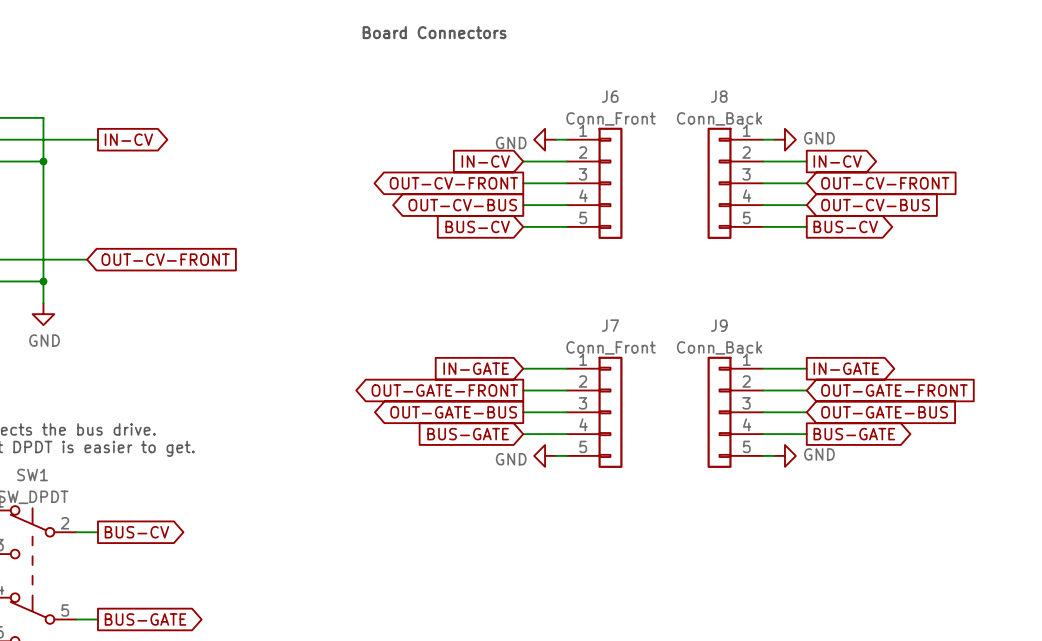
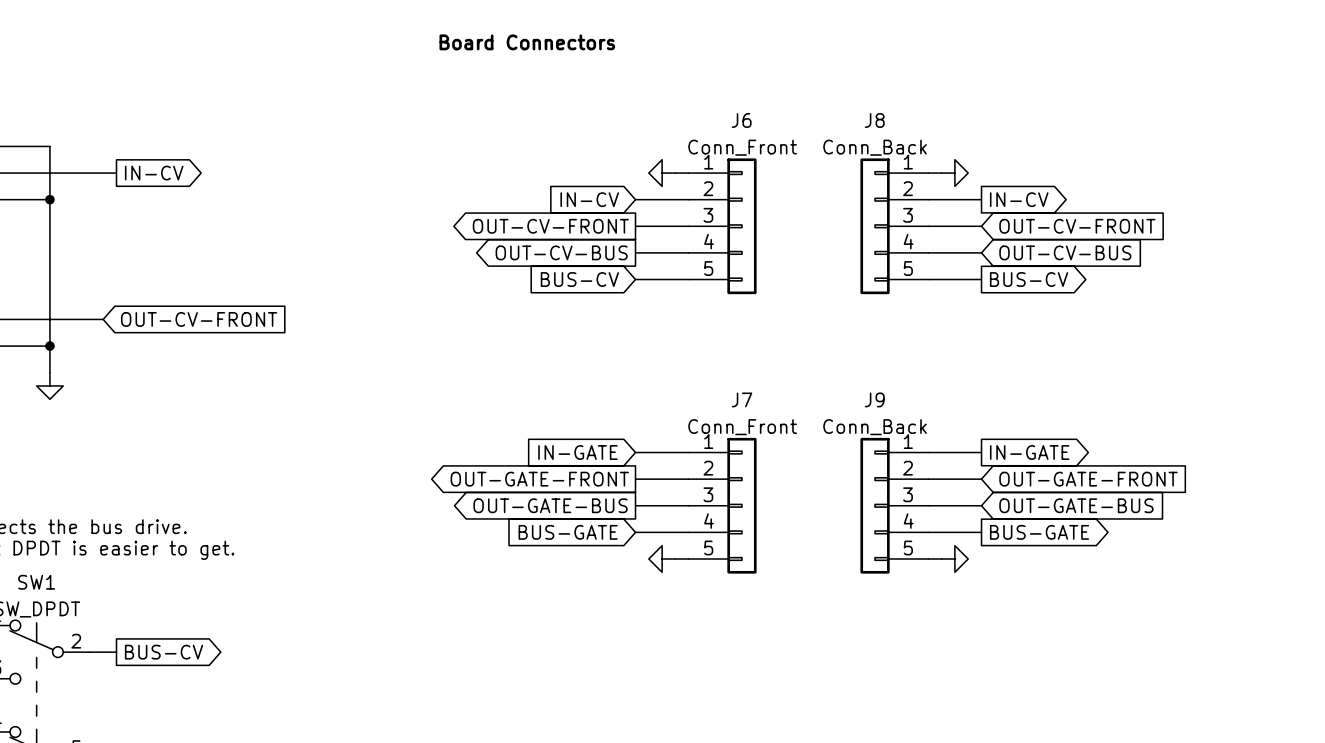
power symbol text: GND (819, 138) -> none
power symbol text: GND (511, 143) -> none
power symbol text: GND (44, 340) -> none
power symbol text: GND (819, 454) -> none
power symbol text: GND (511, 459) -> none

